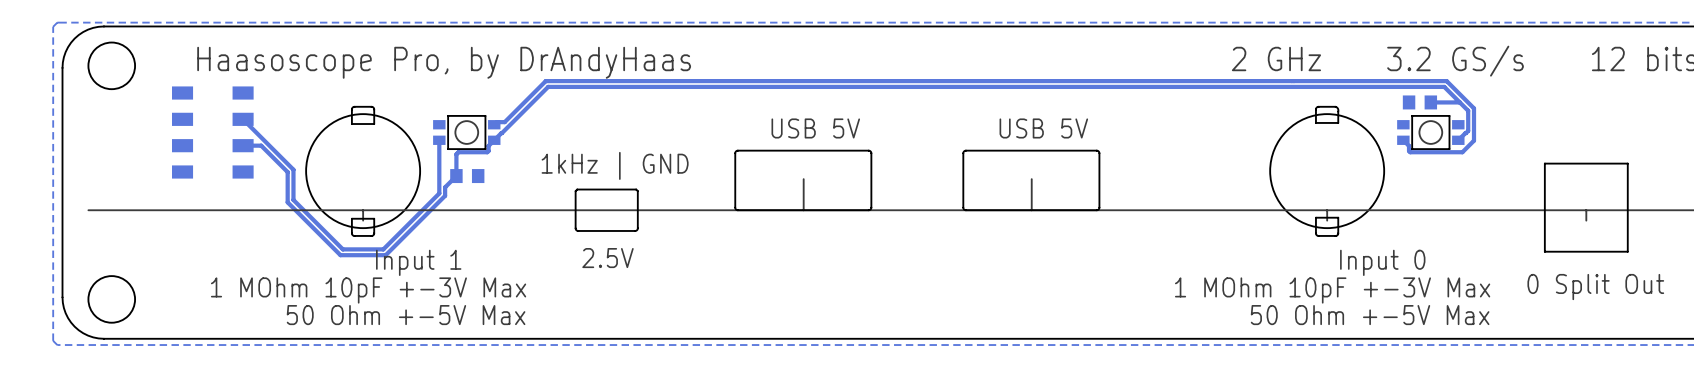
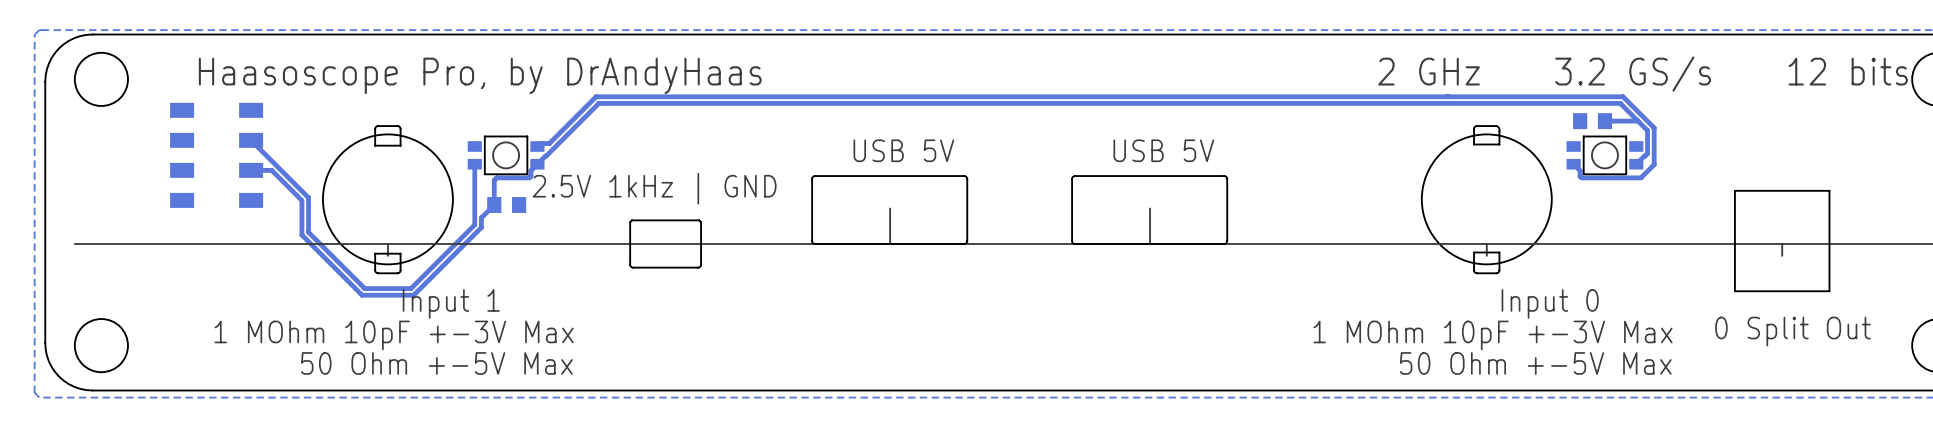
text: 1kHz | GND (615, 165) -> 2.5V 1kHz | GND (654, 188)
text: 2.5V (607, 258) -> none

